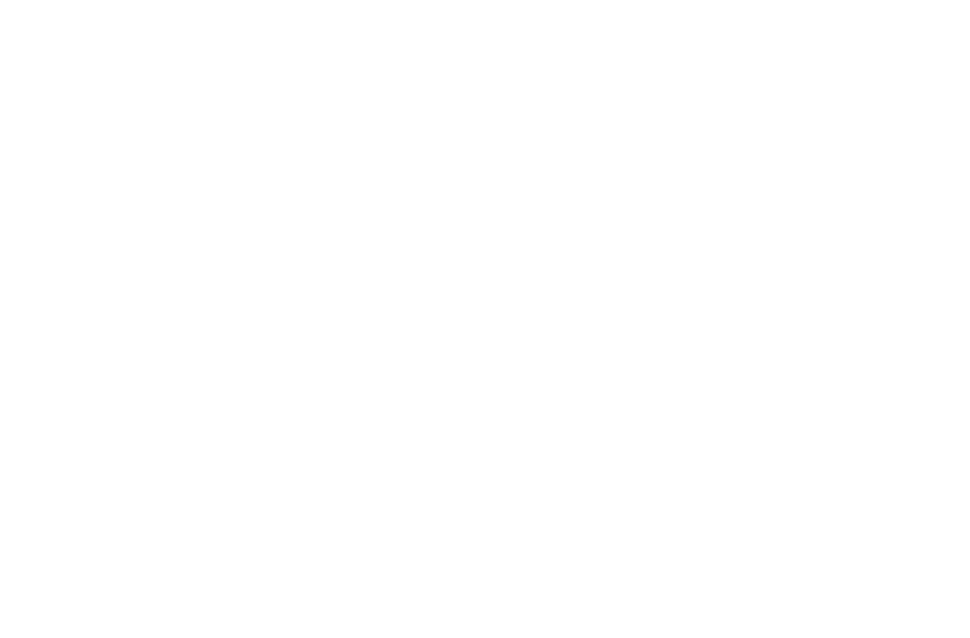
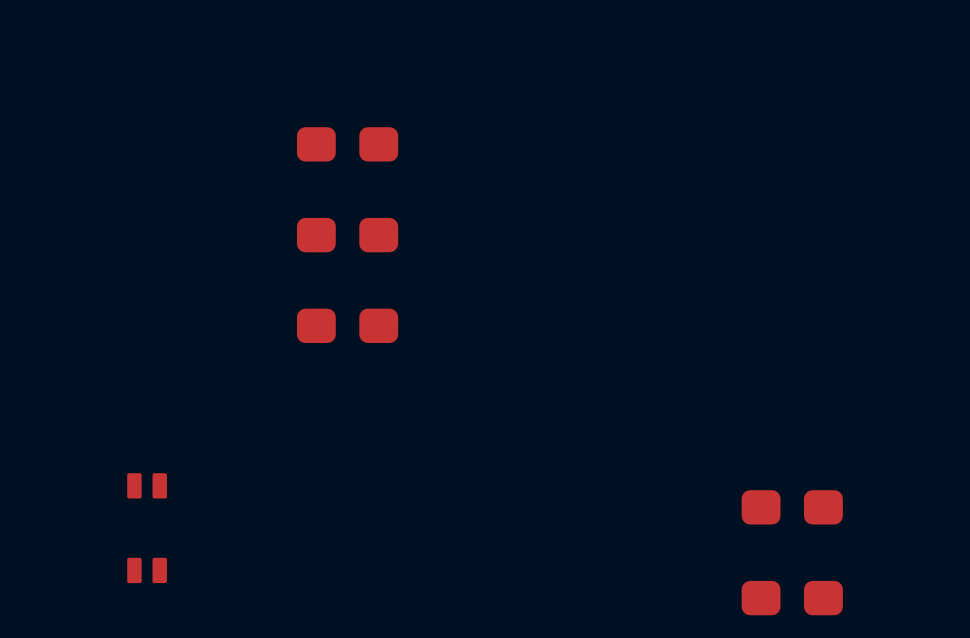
part: none -> (347, 144)
part: none -> (347, 235)
part: none -> (347, 325)
part: none -> (147, 485)
part: none -> (792, 507)
part: none -> (147, 570)
part: none -> (792, 598)

